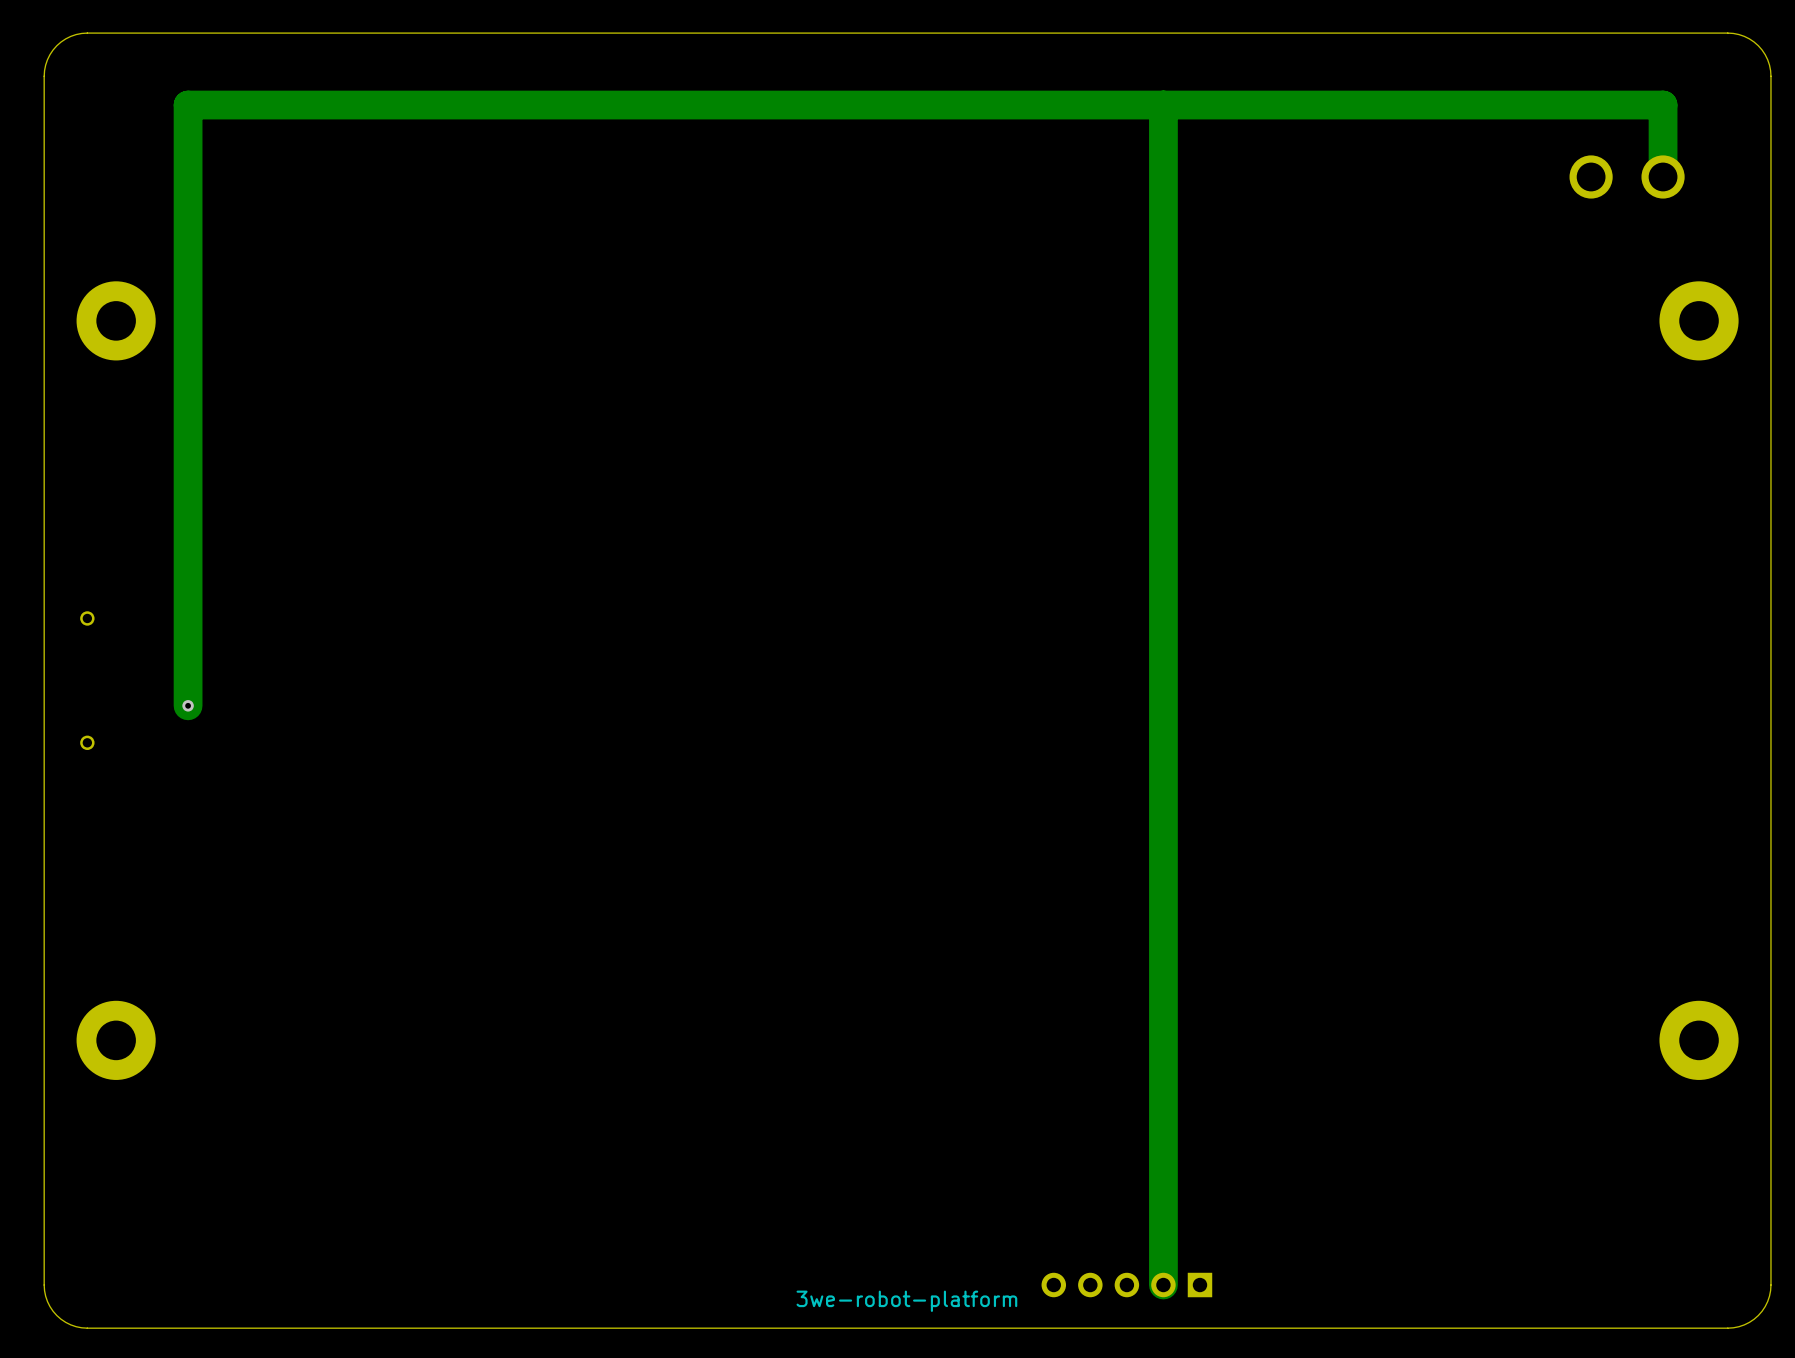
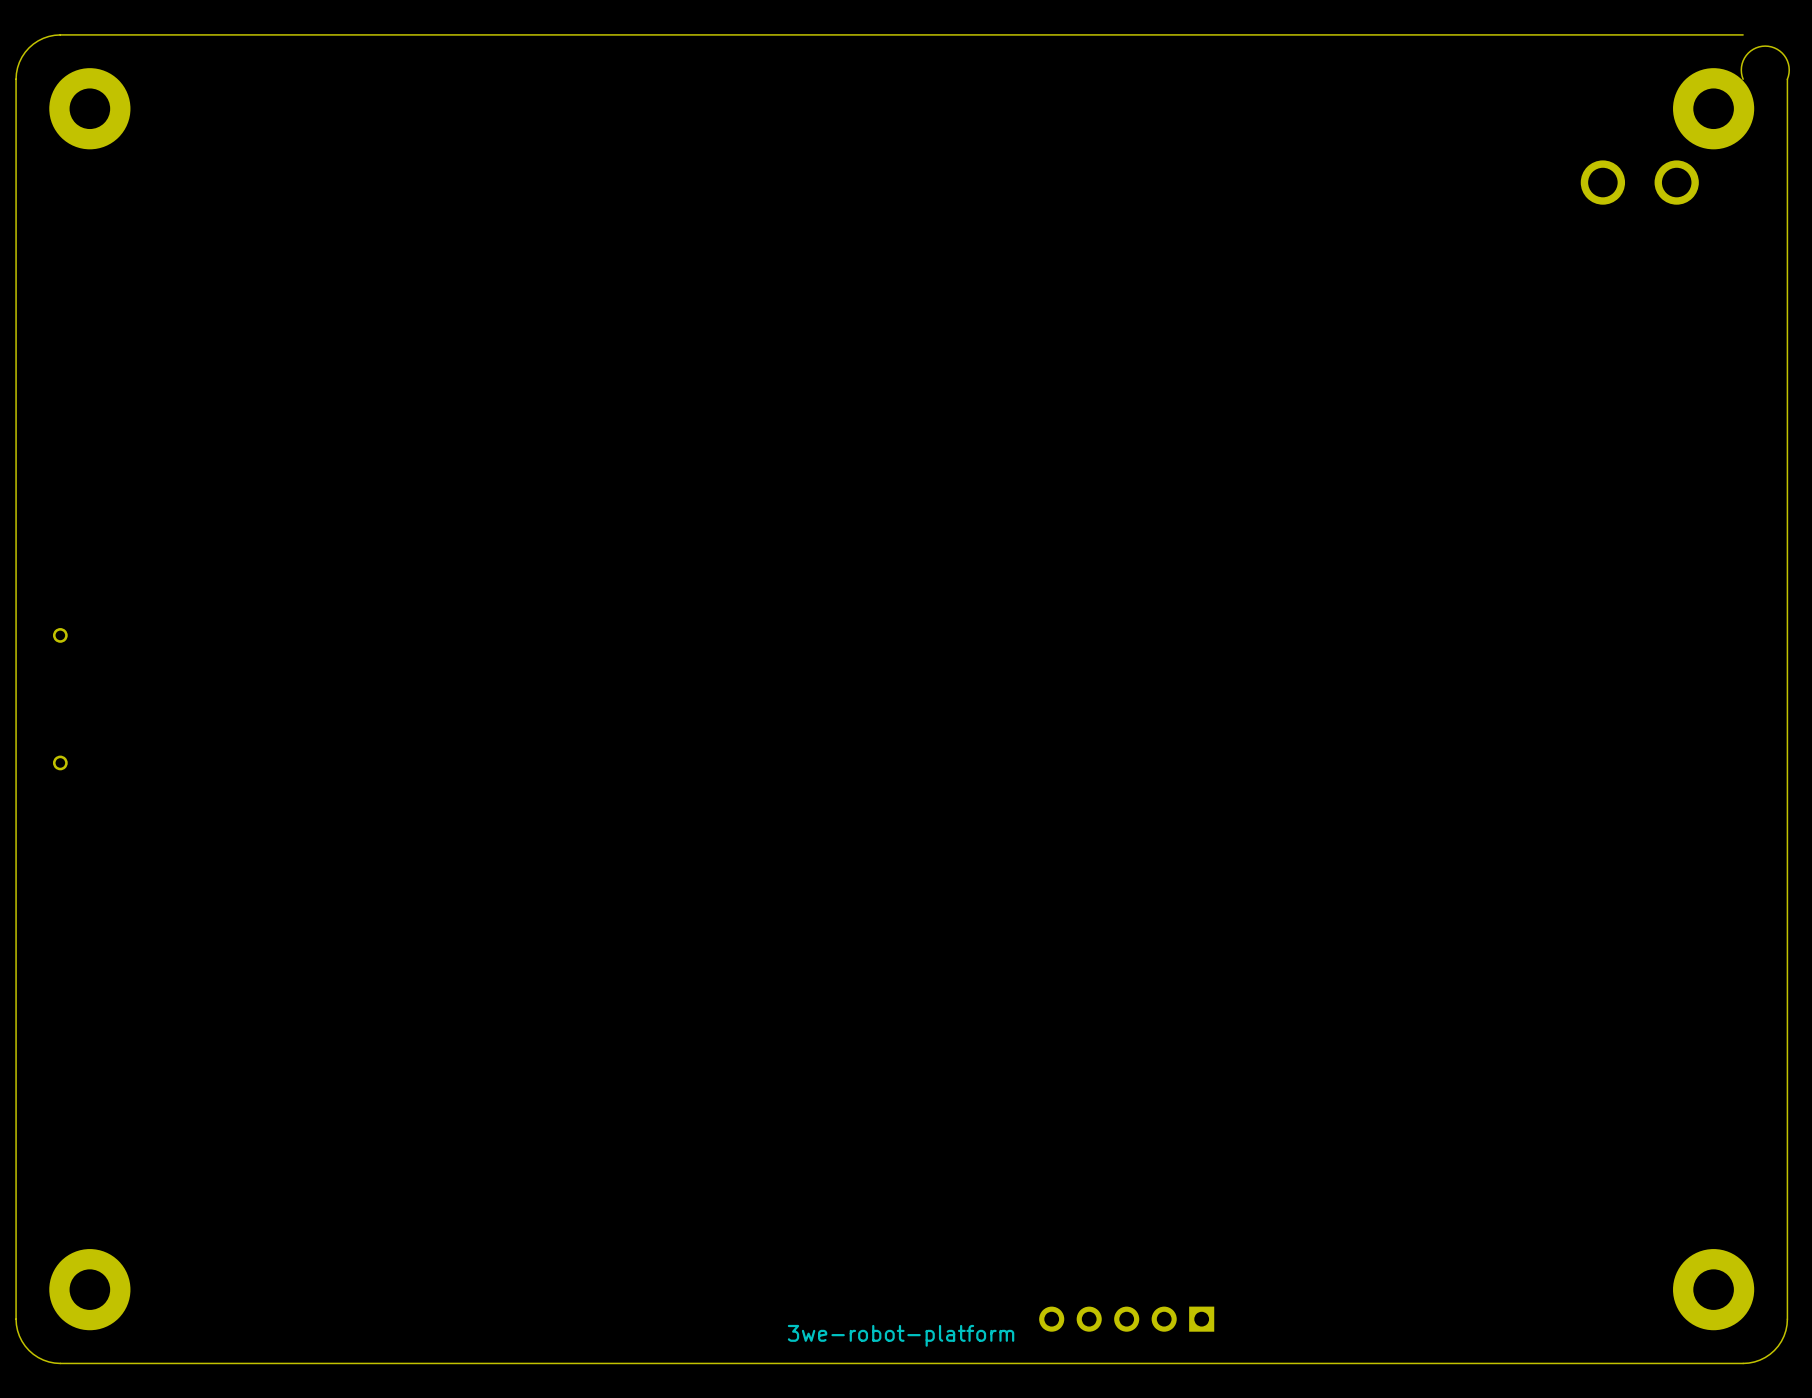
board edge: (1727, 33) (1744, 36) (1758, 45) (1767, 59) (1770, 76) -> (1743, 79) (1741, 66) (1746, 55) (1756, 47) (1765, 46) (1777, 49) (1786, 58) (1789, 70) (1787, 79)
track: (1163, 105) (1163, 1285) -> none
track: (1663, 176) (1663, 105) (188, 105) (188, 705) -> none
part position: (116, 320) -> (89, 108)
part position: (1699, 320) -> (1713, 108)
via: (188, 705) -> none
part position: (116, 1040) -> (89, 1289)
part position: (1699, 1040) -> (1713, 1289)

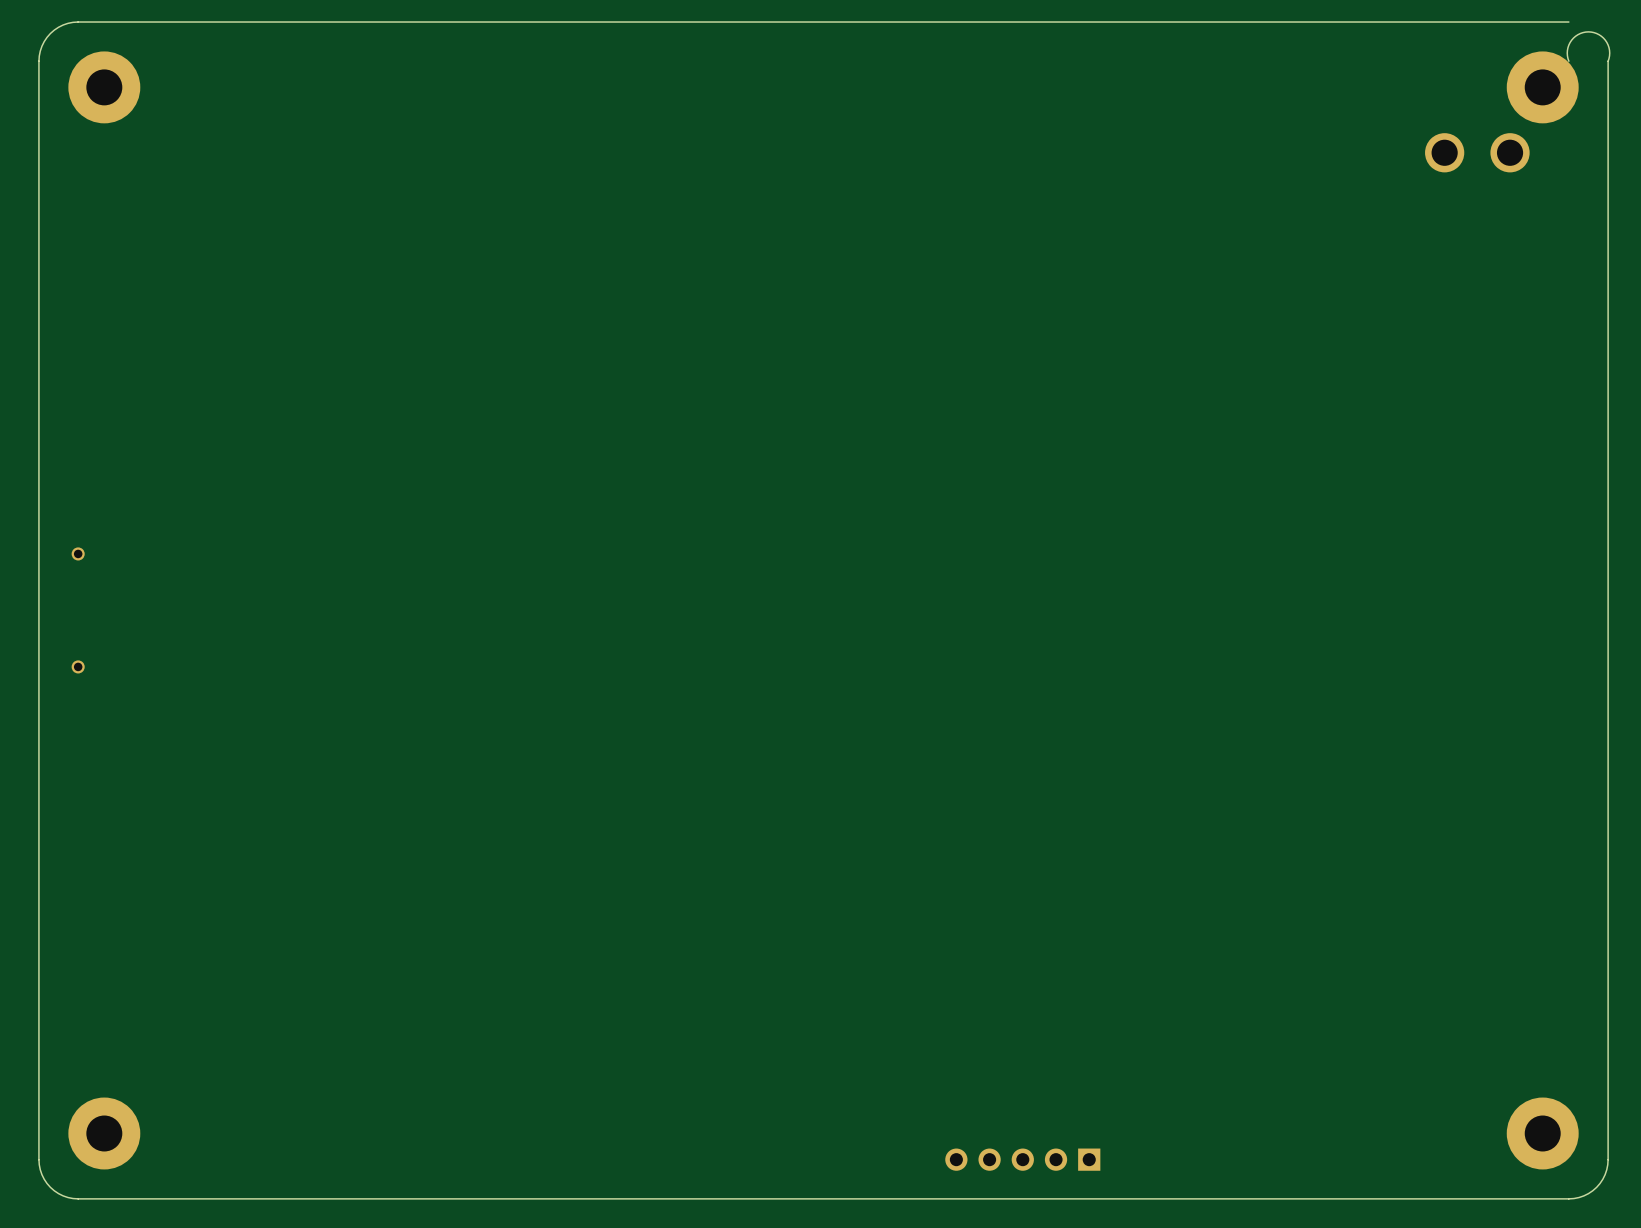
text: 3we-robot-platform (901, 1335) -> none

